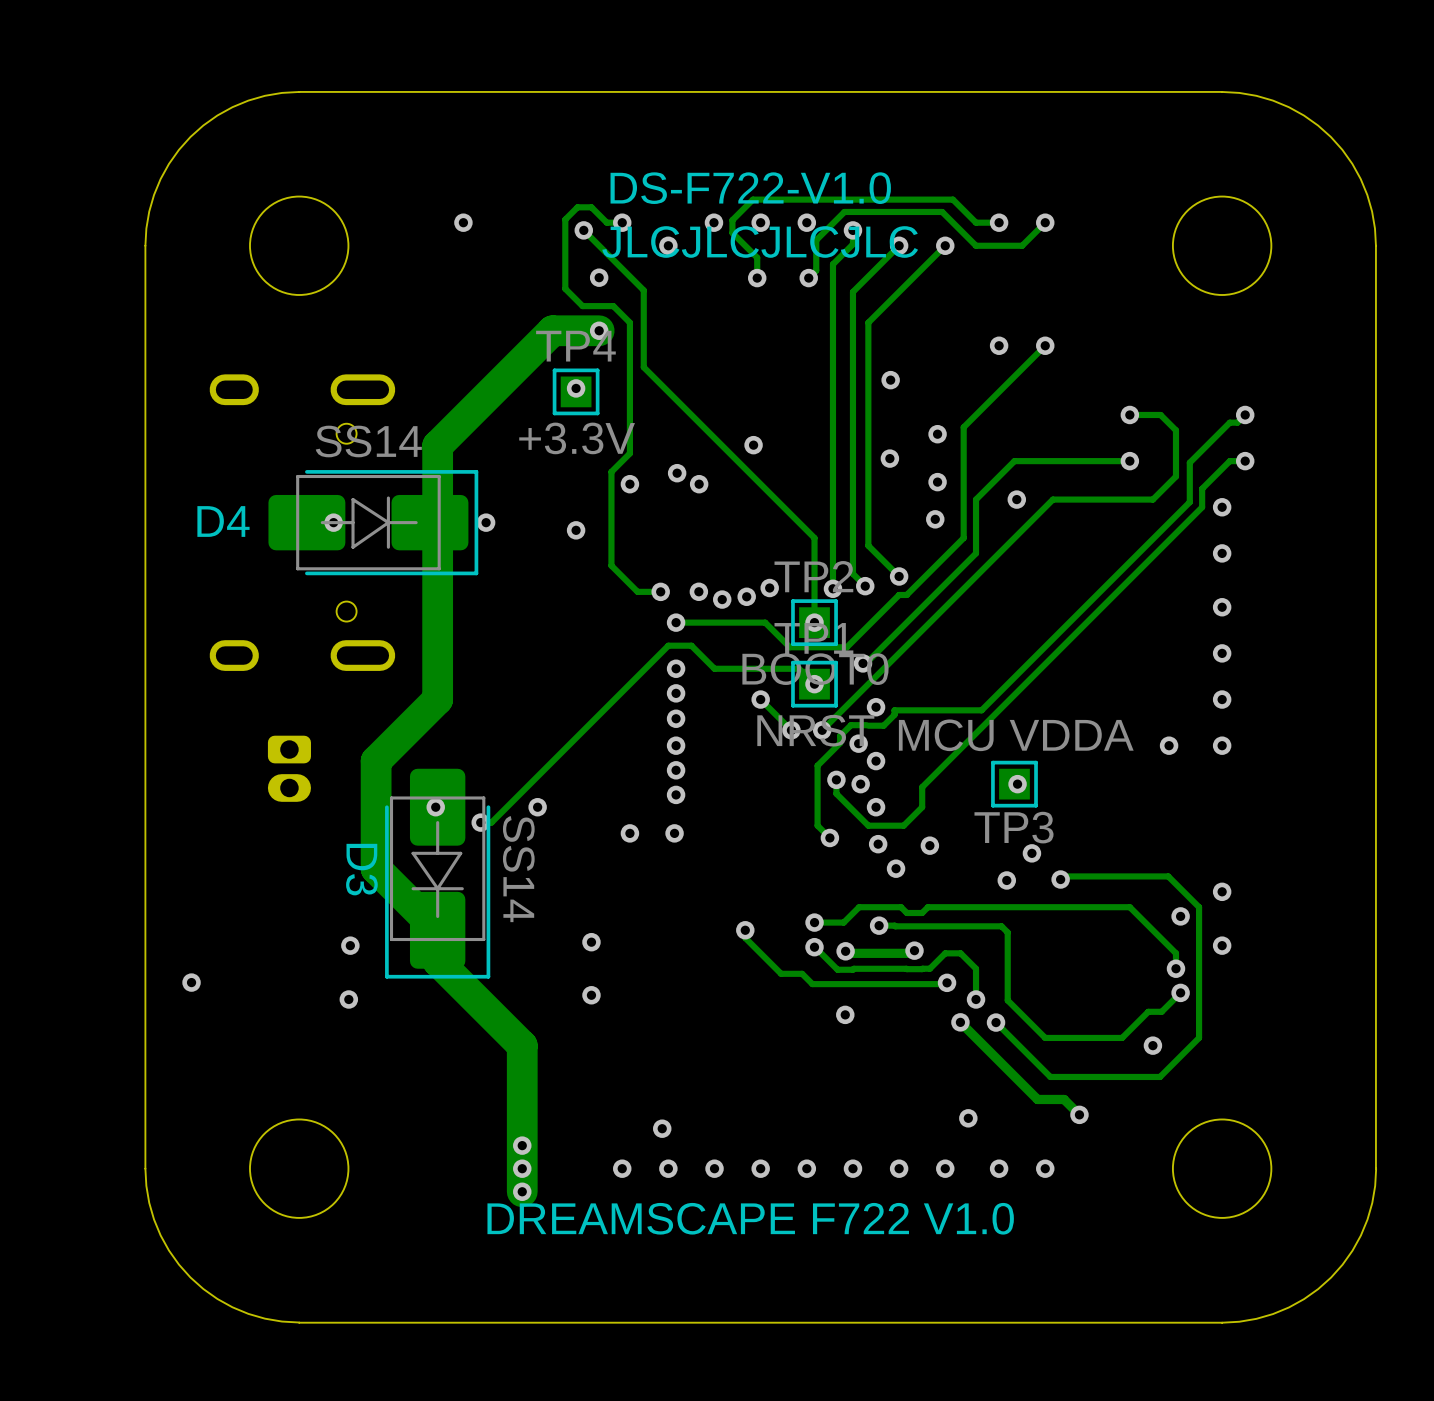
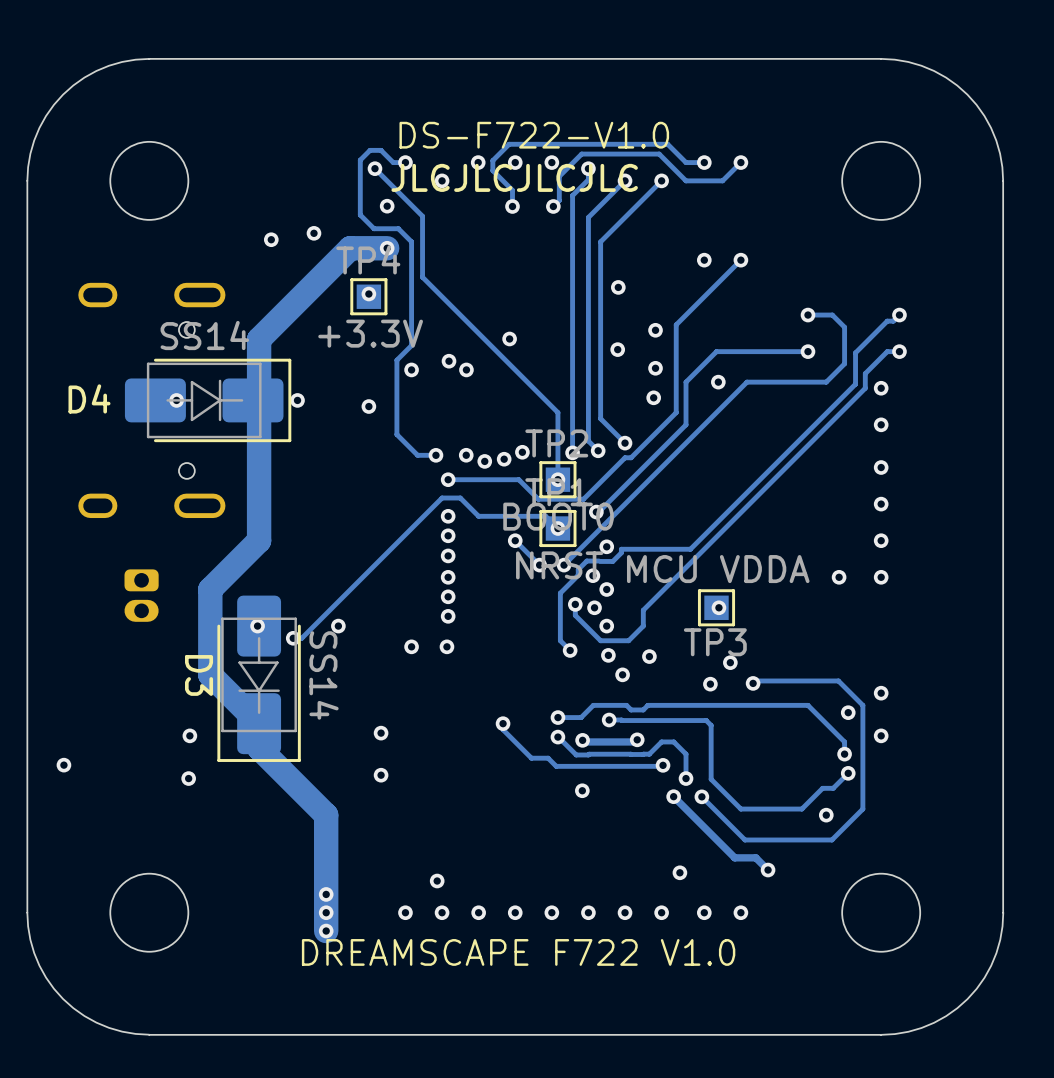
via: (463, 222) -> none
via: none -> (313, 233)
via: none -> (271, 239)

